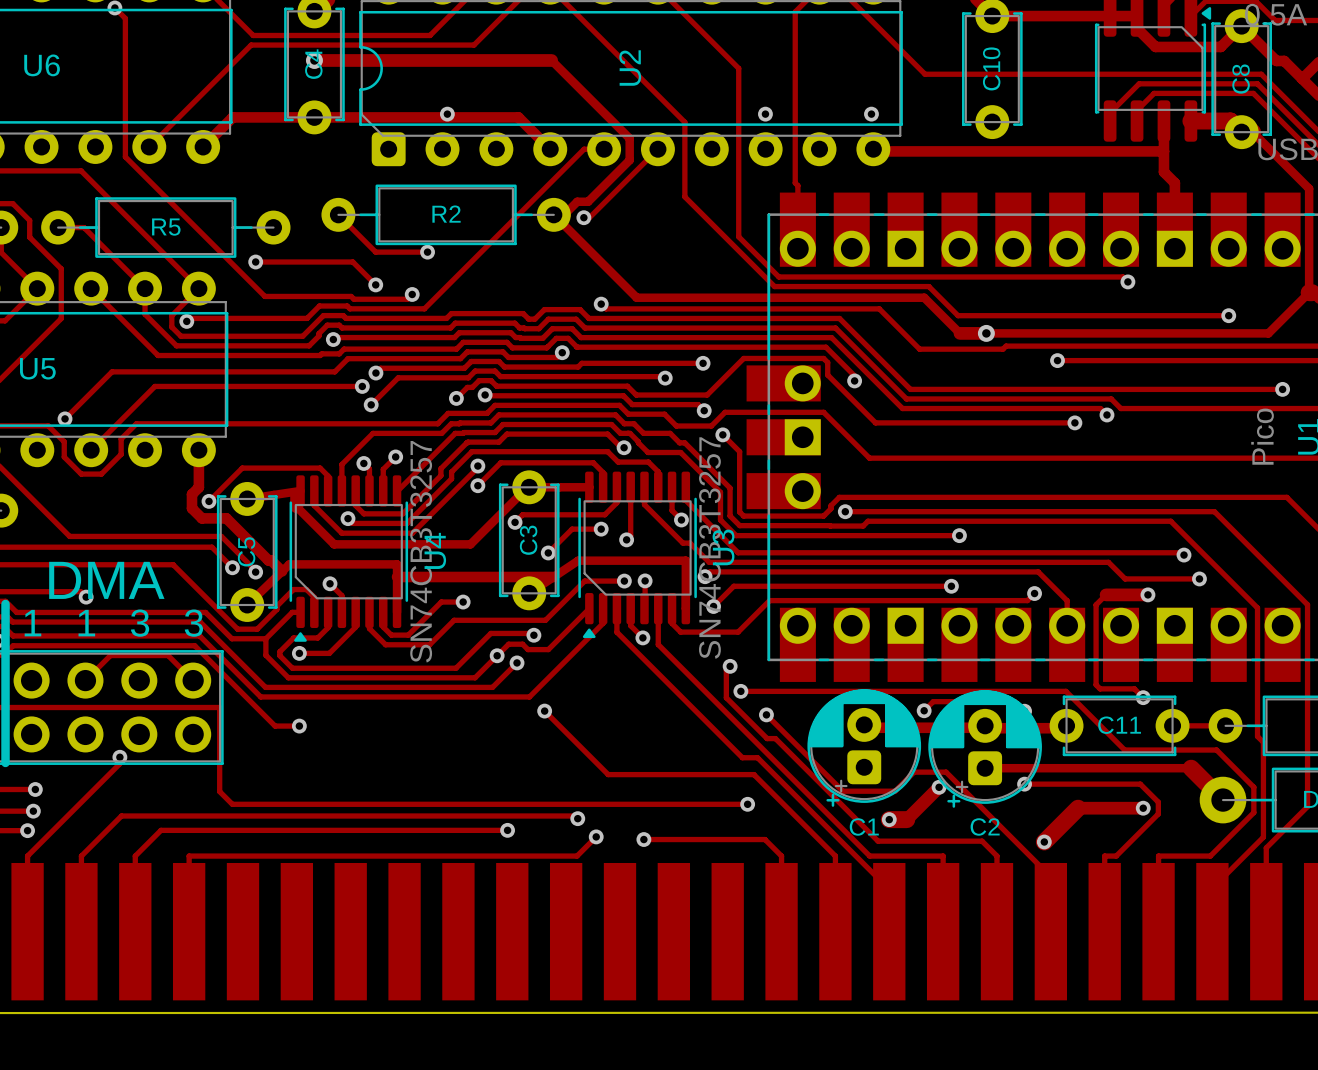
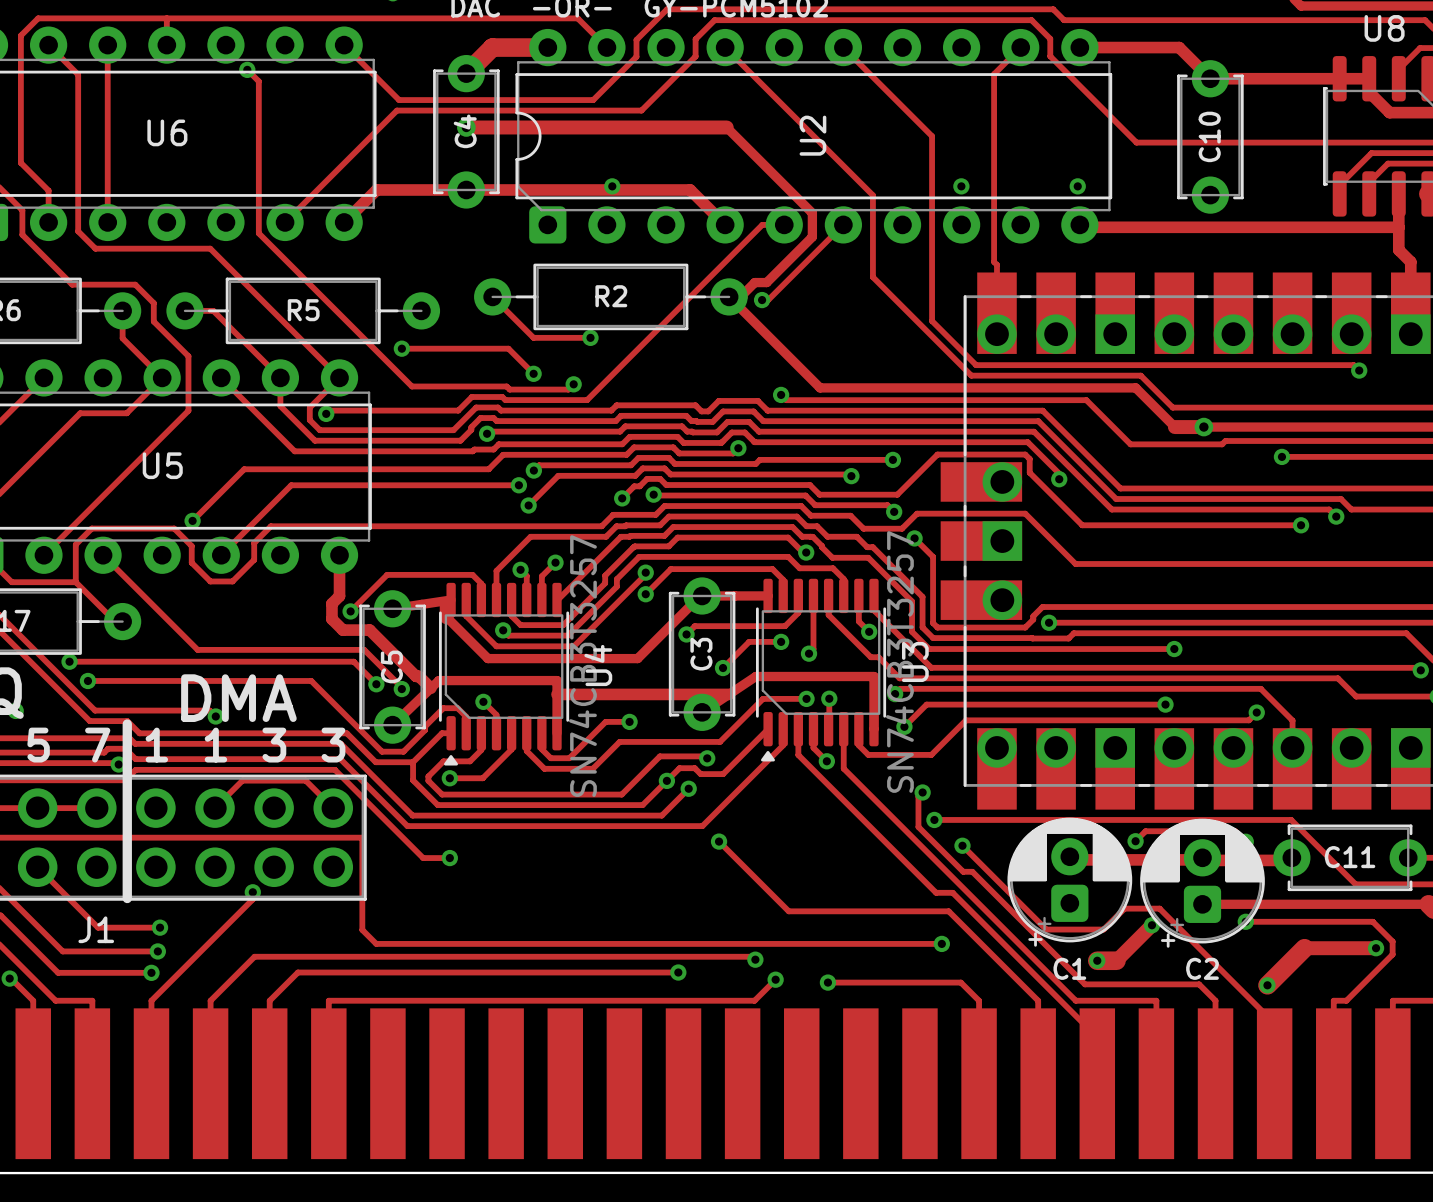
track: (1147, 594) (1106, 594) (1096, 604) (1096, 684) (1100, 688) (1134, 688) (1143, 697) -> none
via: (1147, 594) -> none
via: (1143, 697) -> none

